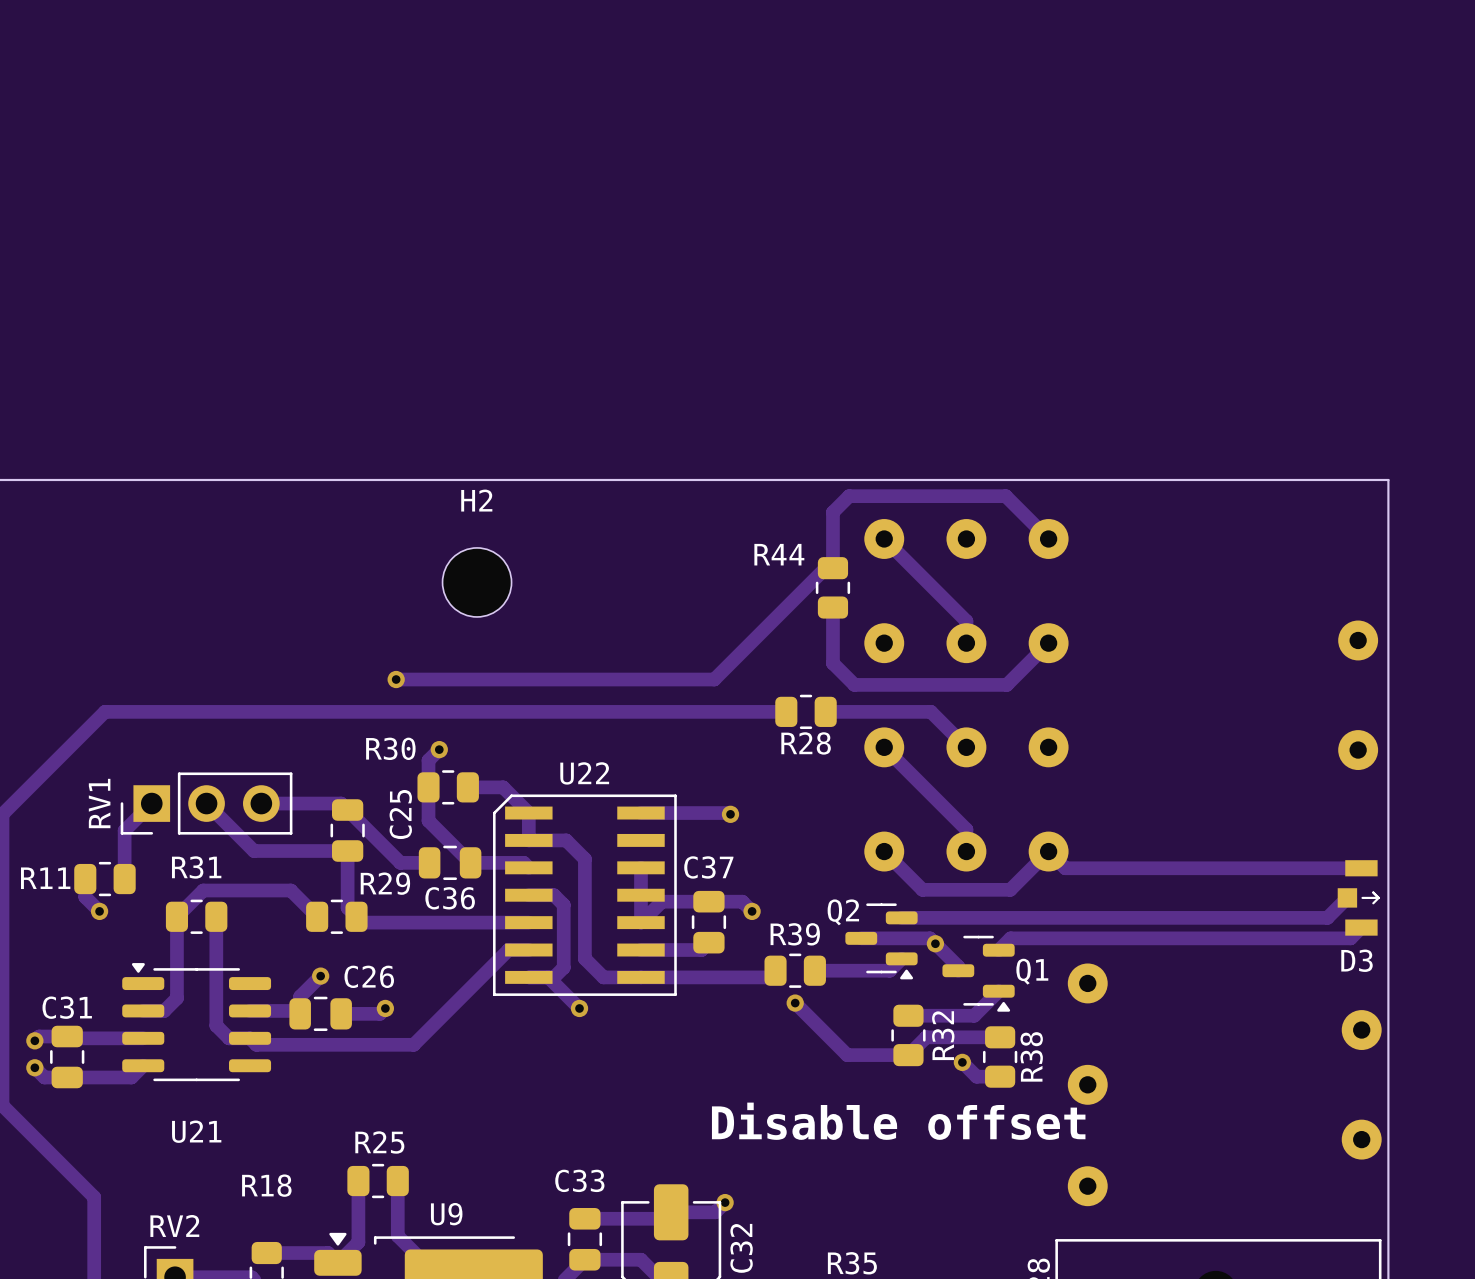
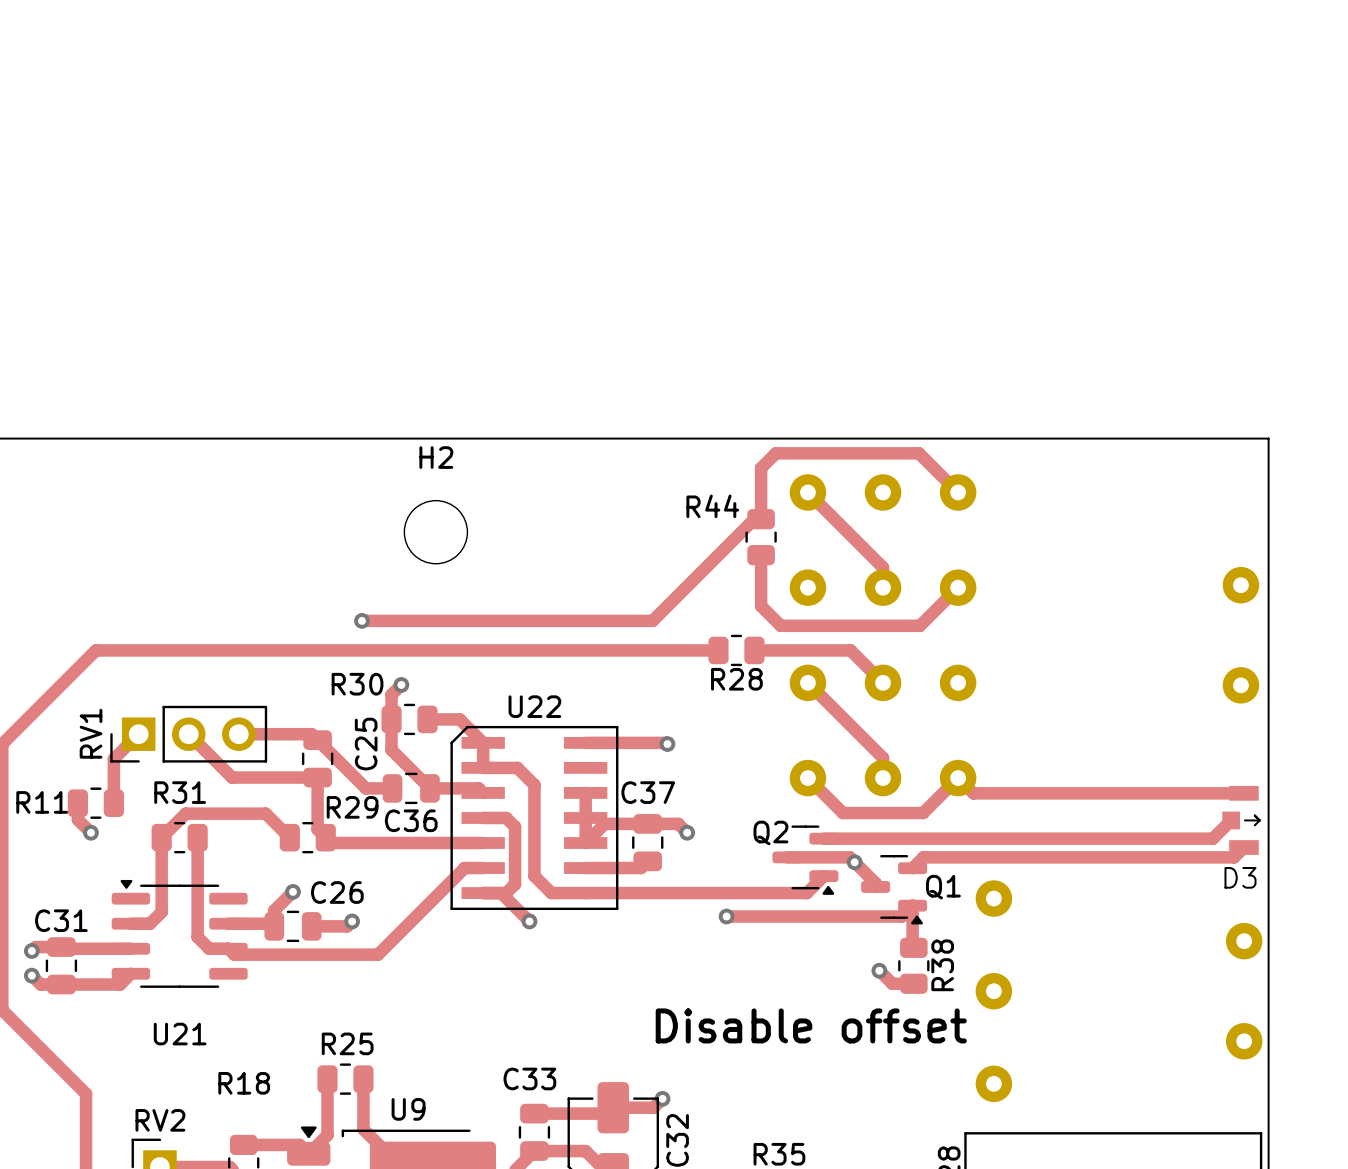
R39: (795, 970) -> none
track: (814, 970) (889, 970) -> (702, 893) (806, 893) (813, 886)
track: none -> (912, 905) (912, 946)
track: (795, 1003) (847, 1055) (908, 1055) (926, 1037) (1000, 1037) -> (726, 916) (901, 916)
track: (986, 1003) (974, 1015) (908, 1015) -> none
R32: (908, 1035) -> none

